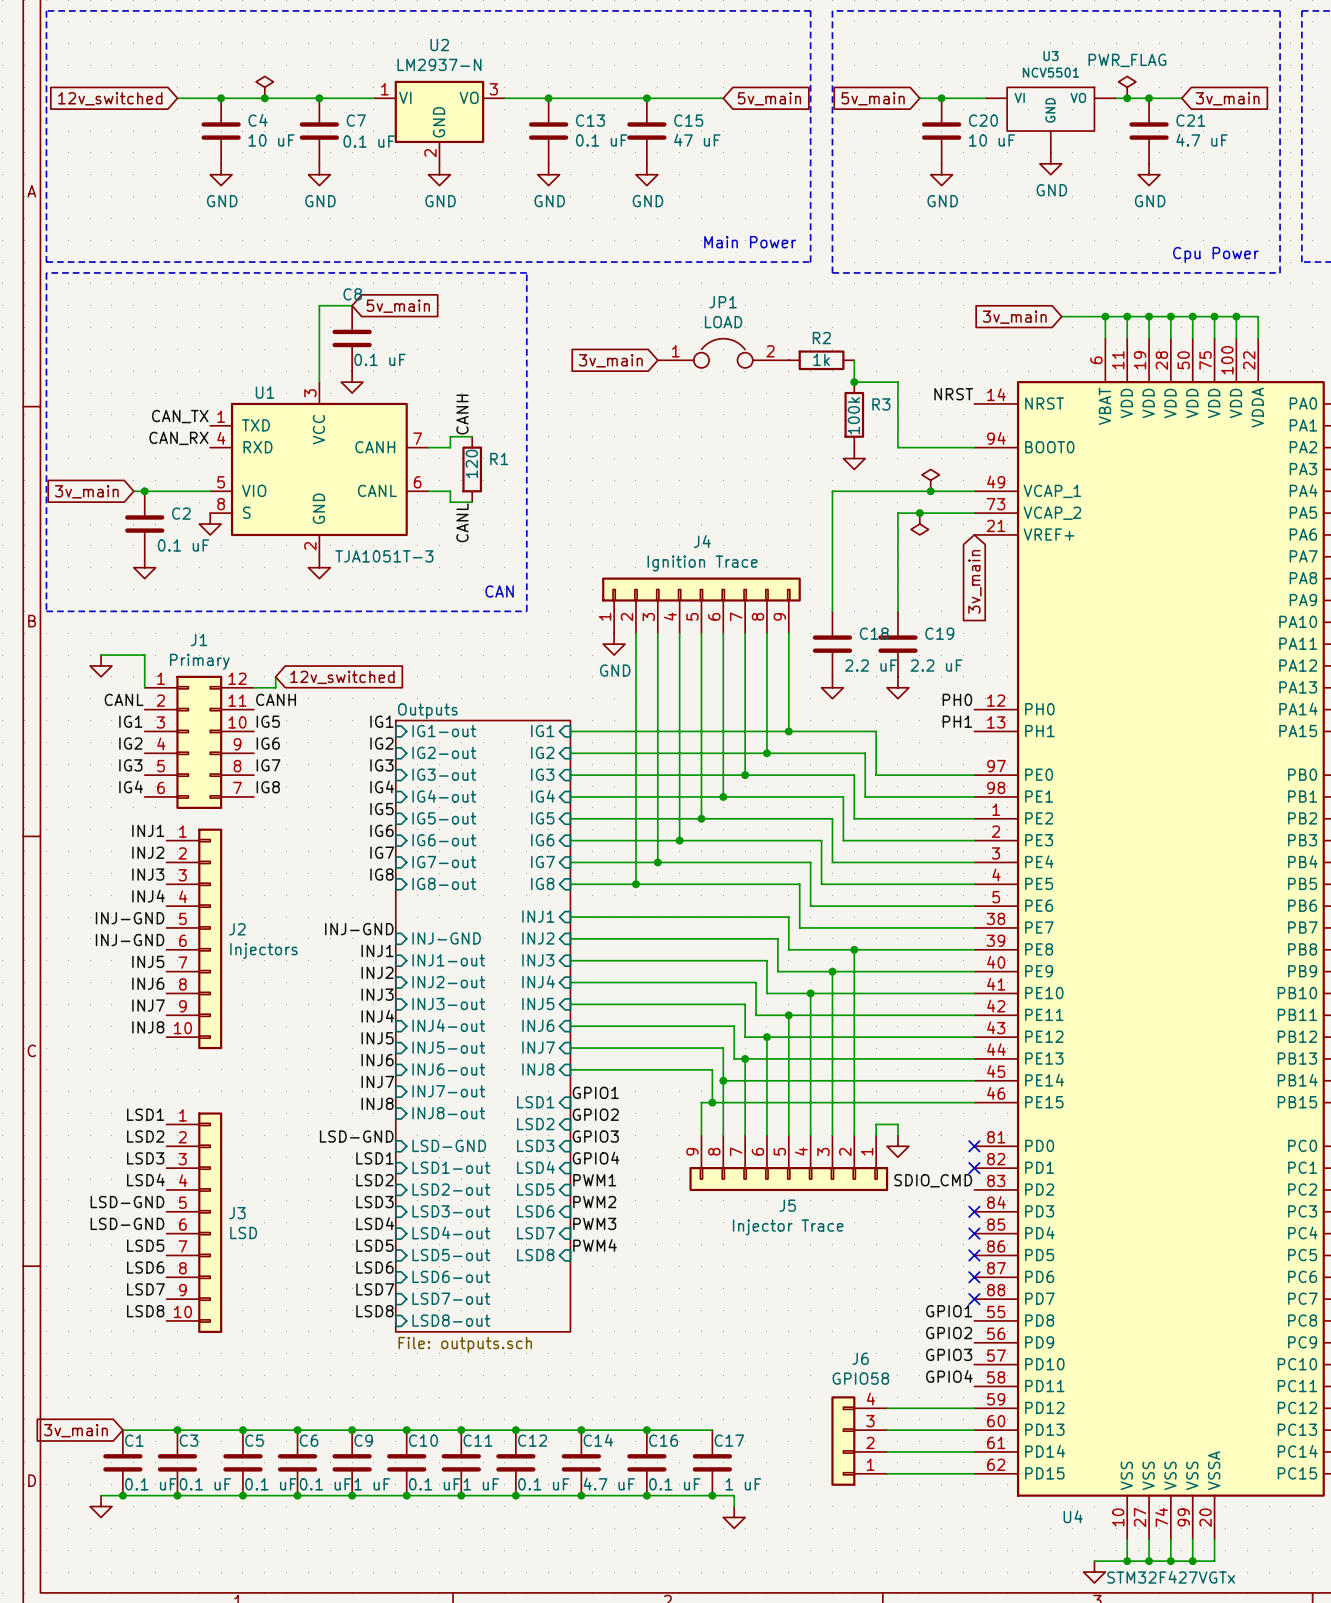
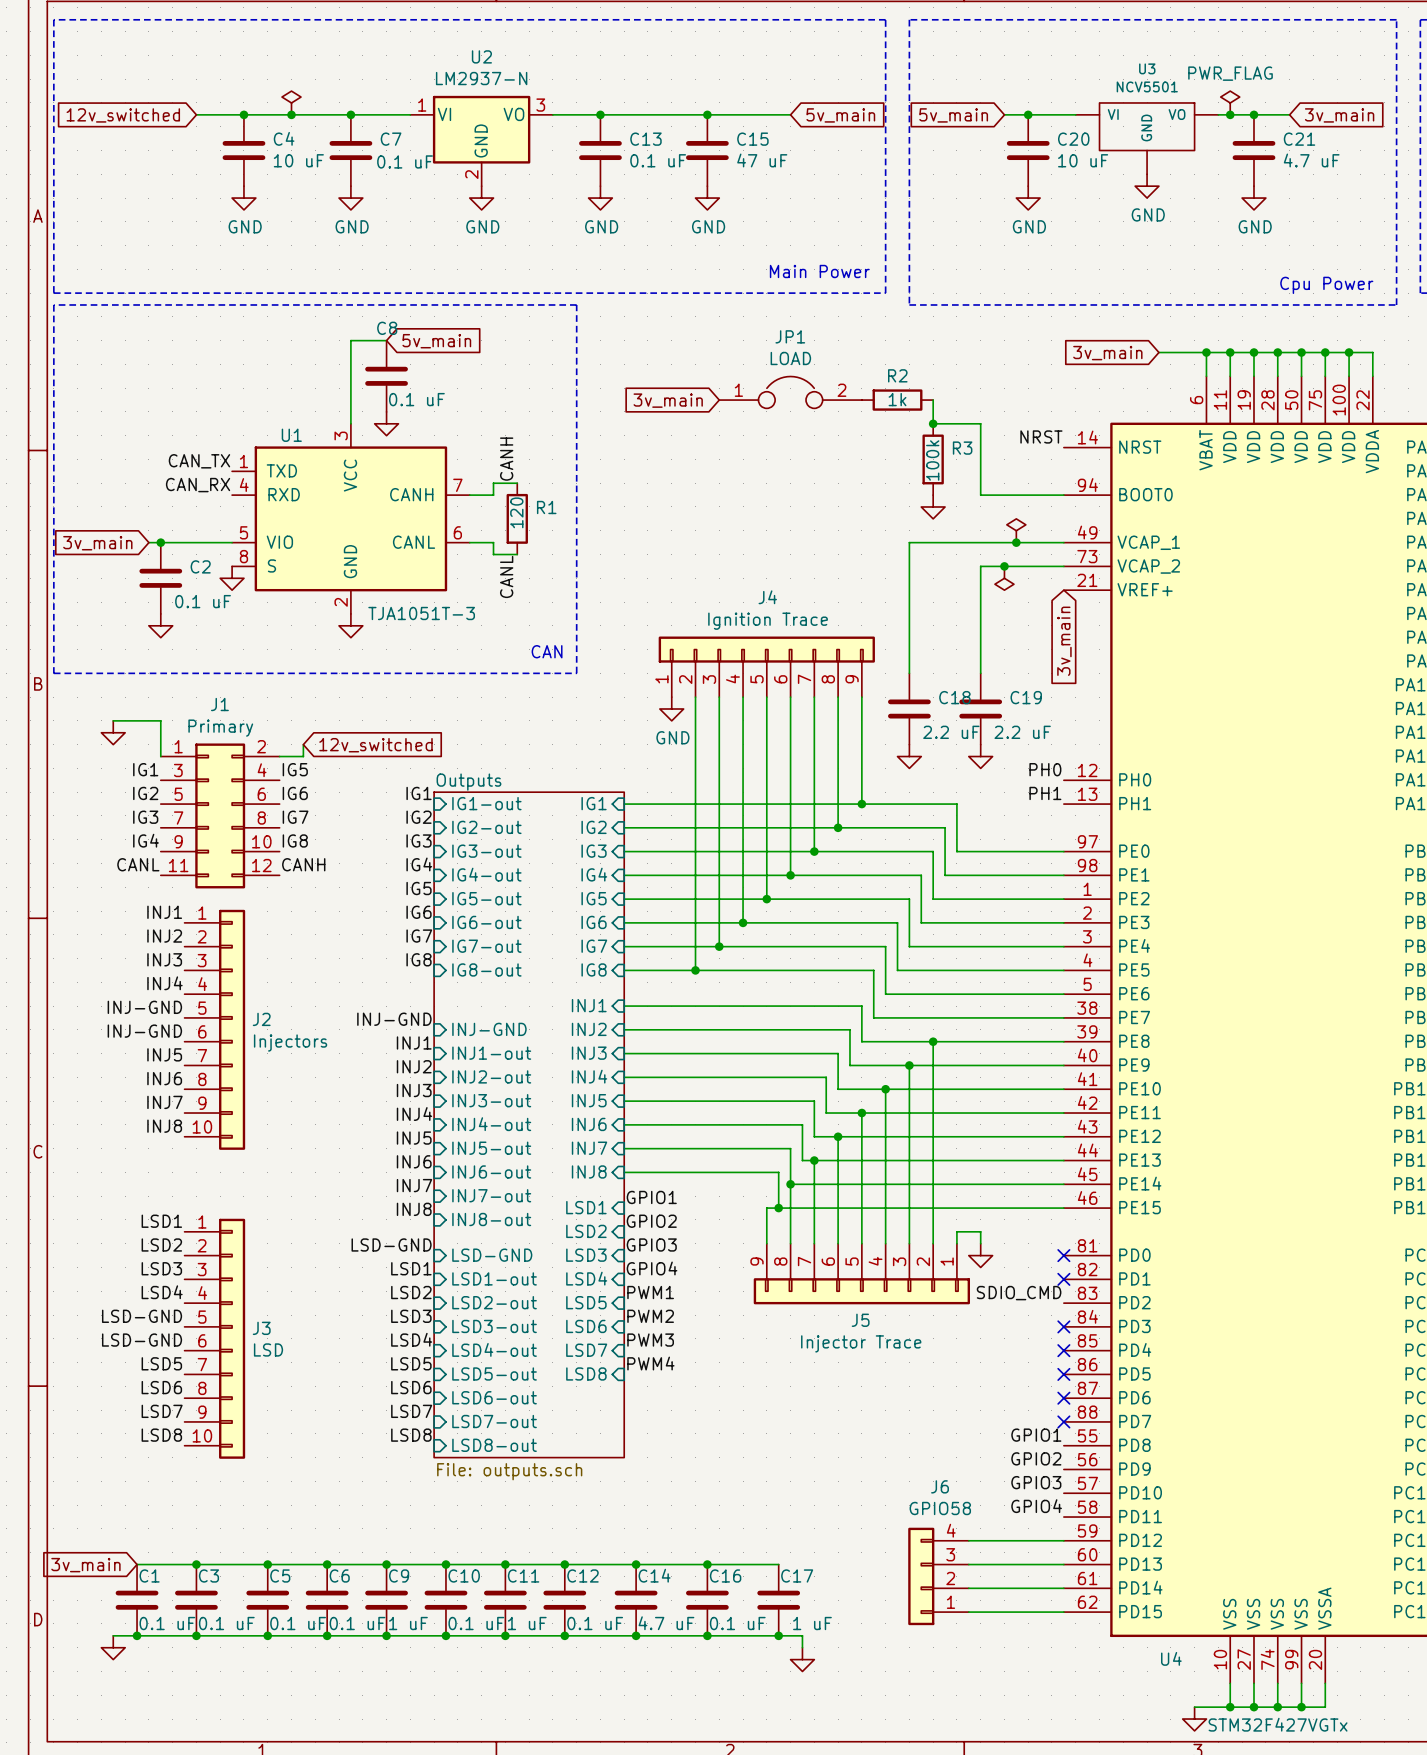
J1 symbol: [144, 675, 254, 809] -> [160, 743, 280, 889]
label: CANL (124, 699) -> IG1 (145, 769)
label: CANH (276, 699) -> IG5 (295, 769)
label: IG1 (130, 721) -> IG2 (145, 793)
label: IG5 (268, 721) -> IG6 (295, 793)
label: IG2 (130, 743) -> IG3 (145, 817)
label: IG6 (268, 743) -> IG7 (295, 817)
label: IG3 (130, 765) -> IG4 (145, 840)
label: IG7 (268, 765) -> IG8 (295, 840)
label: IG4 (131, 786) -> CANL (138, 864)
label: IG8 (268, 787) -> CANH (303, 864)

